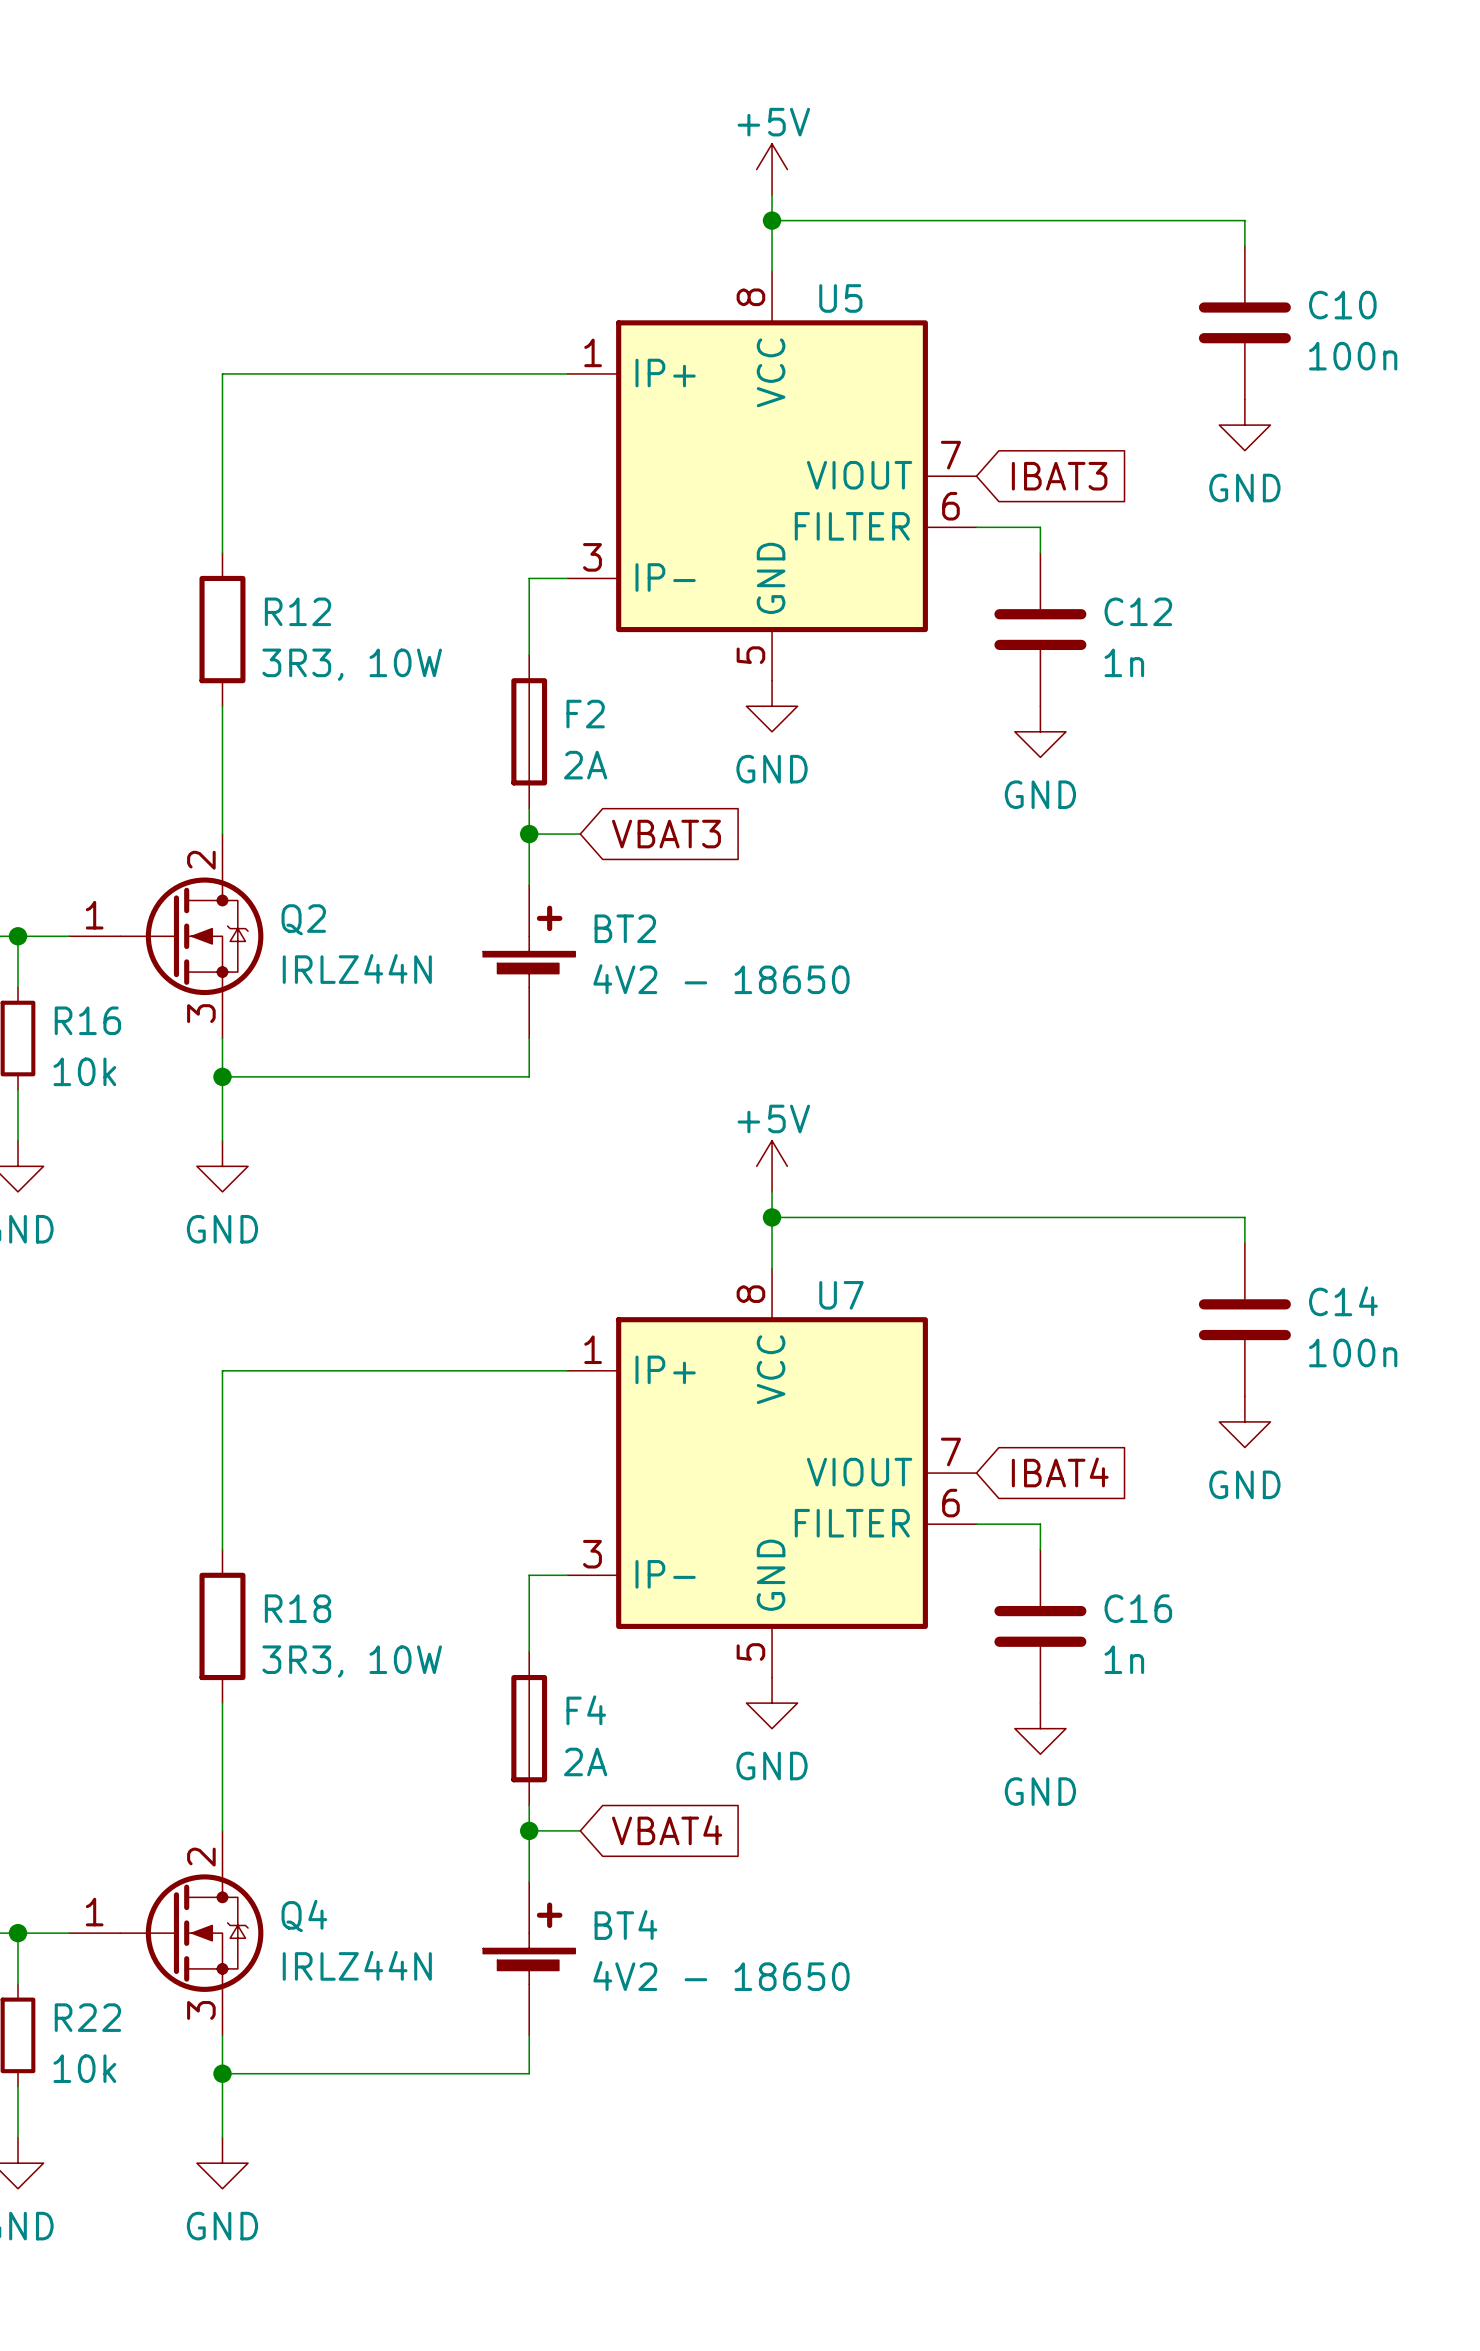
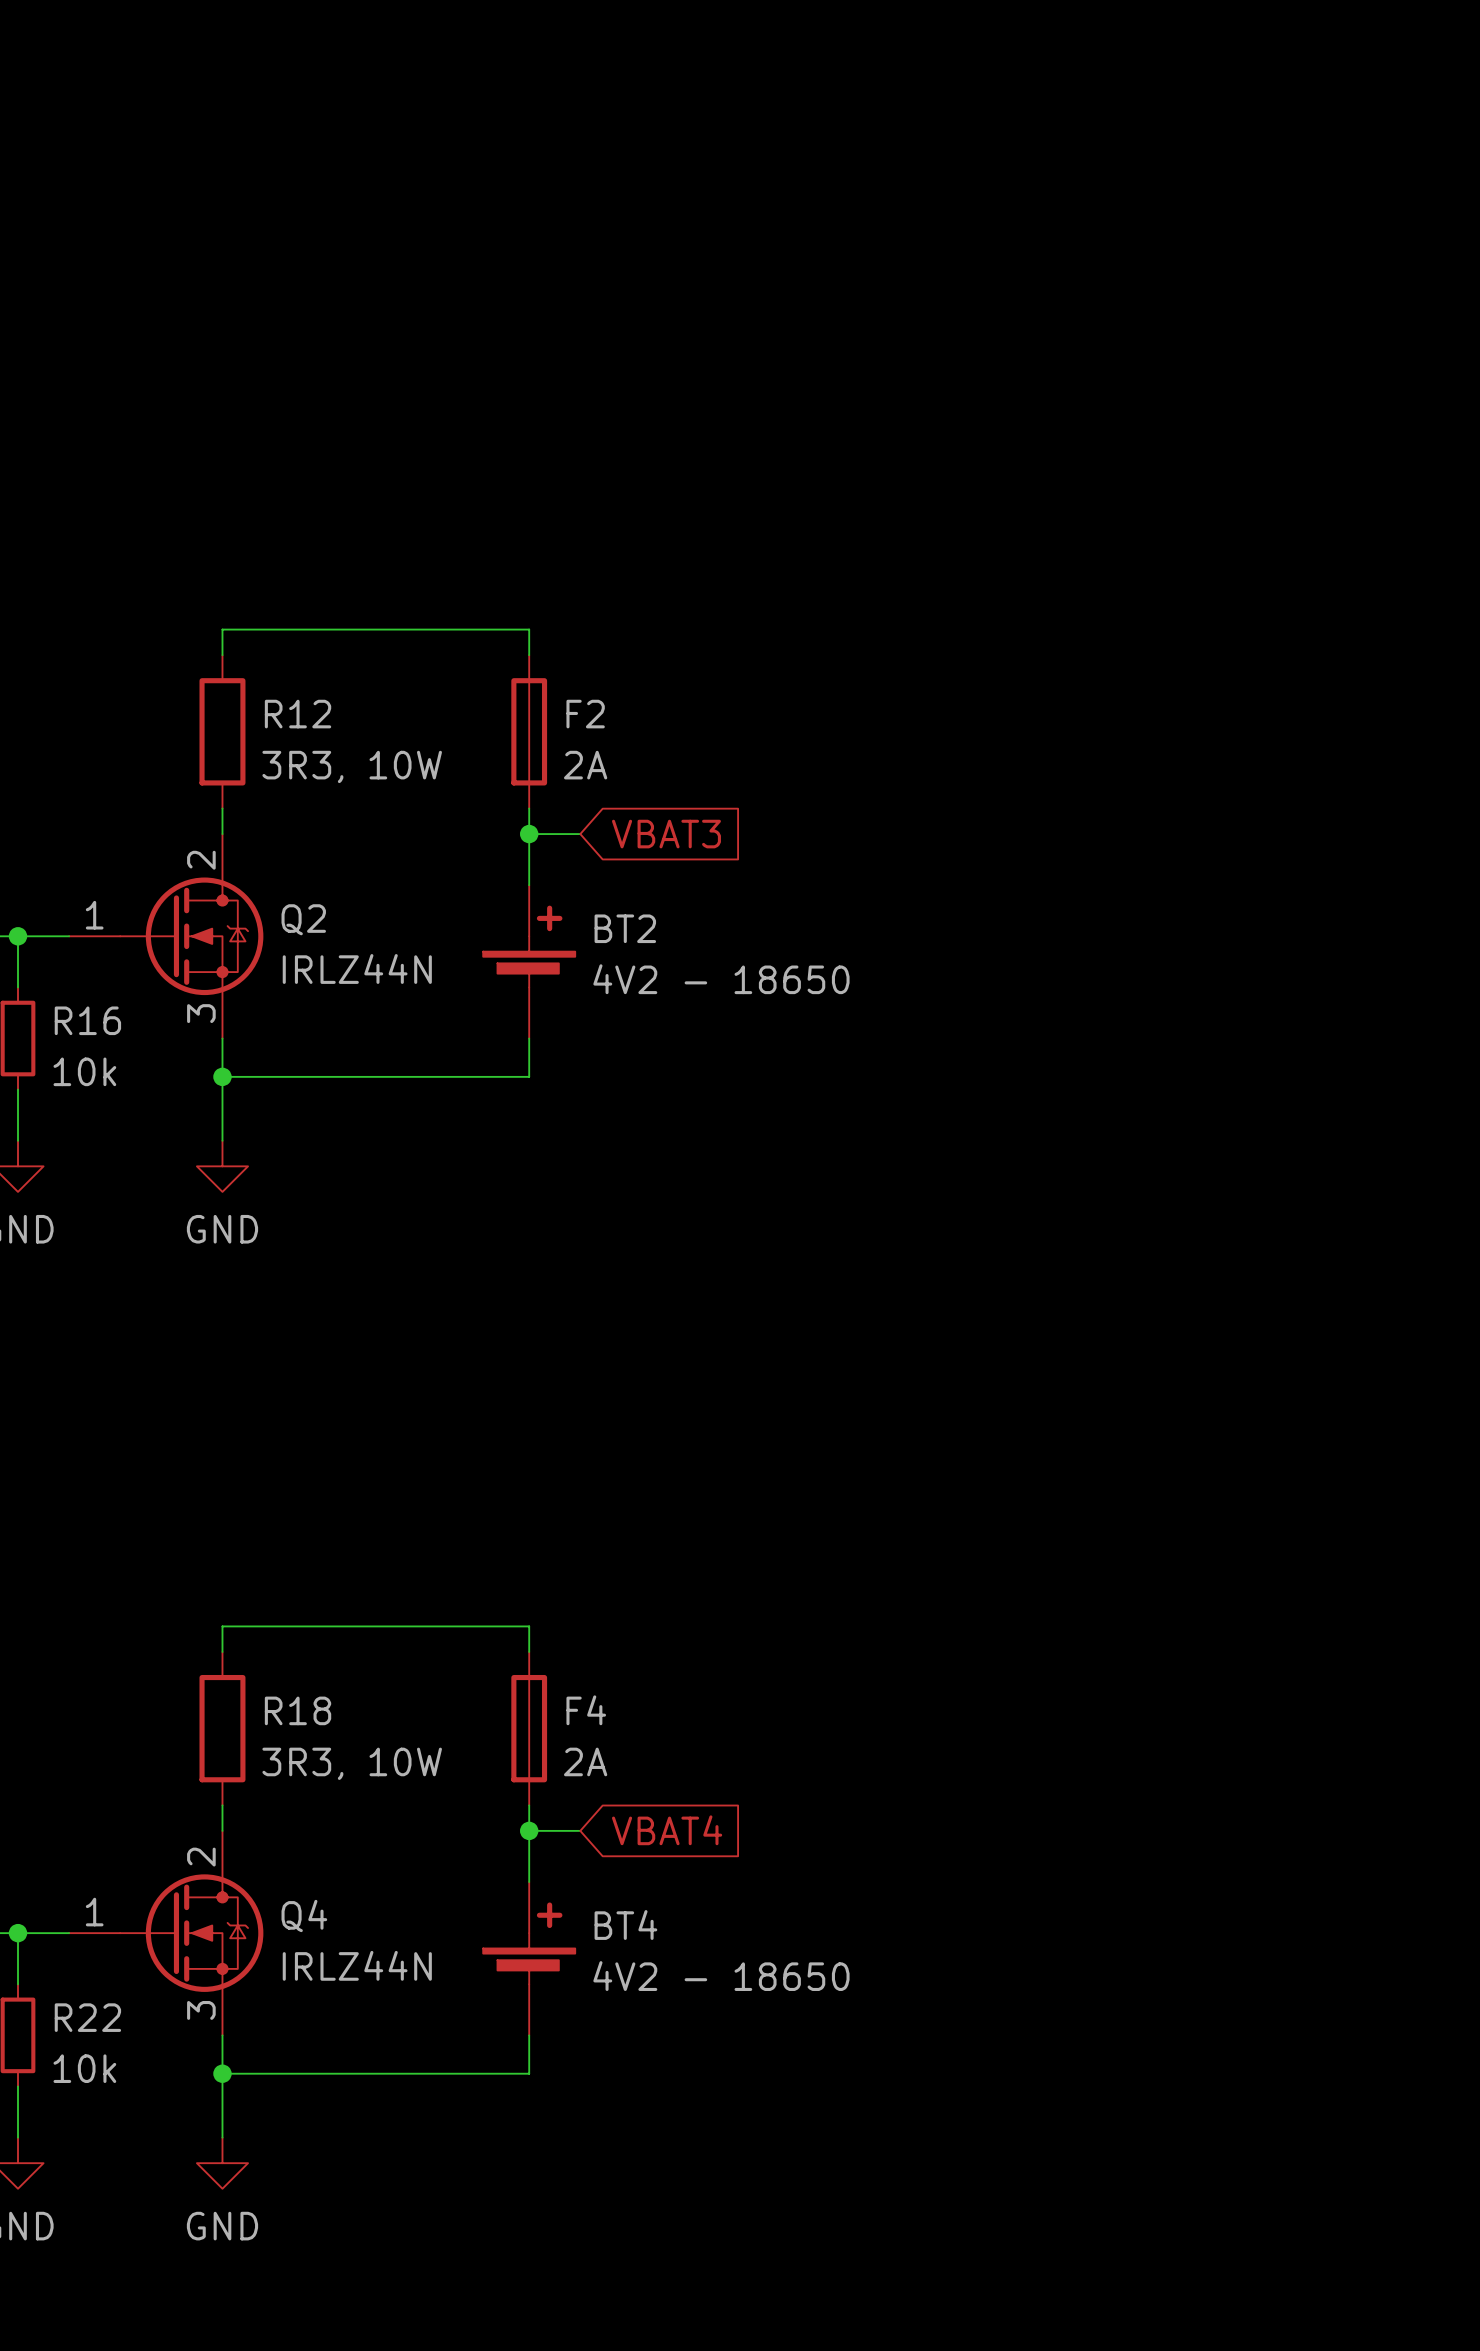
power symbol: +5V (772, 169) -> none
wire: (772, 195) (772, 271) -> none
wire: (772, 220) (1244, 220) (1244, 246) -> none
junction: (772, 220) -> none
C10: 100n (1244, 322) -> none
wire: (567, 373) (222, 373) (222, 552) -> none
power symbol: GND (1244, 425) -> none
U5: (772, 476) -> none
global label: IBAT3 (1059, 476) -> none
wire: (976, 527) (1040, 527) (1040, 552) -> none
wire: (567, 578) (529, 578) (529, 629) -> (222, 655) (222, 629) (529, 629)
R12 position: (222, 629) -> (222, 731)
C12: 1n (1040, 629) -> none
wire: (222, 706) (222, 808) -> none
power symbol: GND (772, 706) -> none
power symbol: GND (1040, 731) -> none
power symbol: +5V (772, 1166) -> none
wire: (772, 1191) (772, 1268) -> none
wire: (772, 1217) (1244, 1217) (1244, 1243) -> none
junction: (772, 1217) -> none
C14: 100n (1244, 1319) -> none
wire: (567, 1370) (222, 1370) (222, 1549) -> none
power symbol: GND (1244, 1421) -> none
global label: IBAT4 (1060, 1472) -> none
U7: (772, 1473) -> none
wire: (976, 1524) (1040, 1524) (1040, 1549) -> none
wire: (567, 1575) (529, 1575) (529, 1626) -> (222, 1651) (222, 1626) (529, 1626)
R18 position: (222, 1626) -> (222, 1728)
C16: 1n (1040, 1626) -> none
wire: (222, 1703) (222, 1805) -> none
power symbol: GND (772, 1703) -> none
power symbol: GND (1040, 1728) -> none

